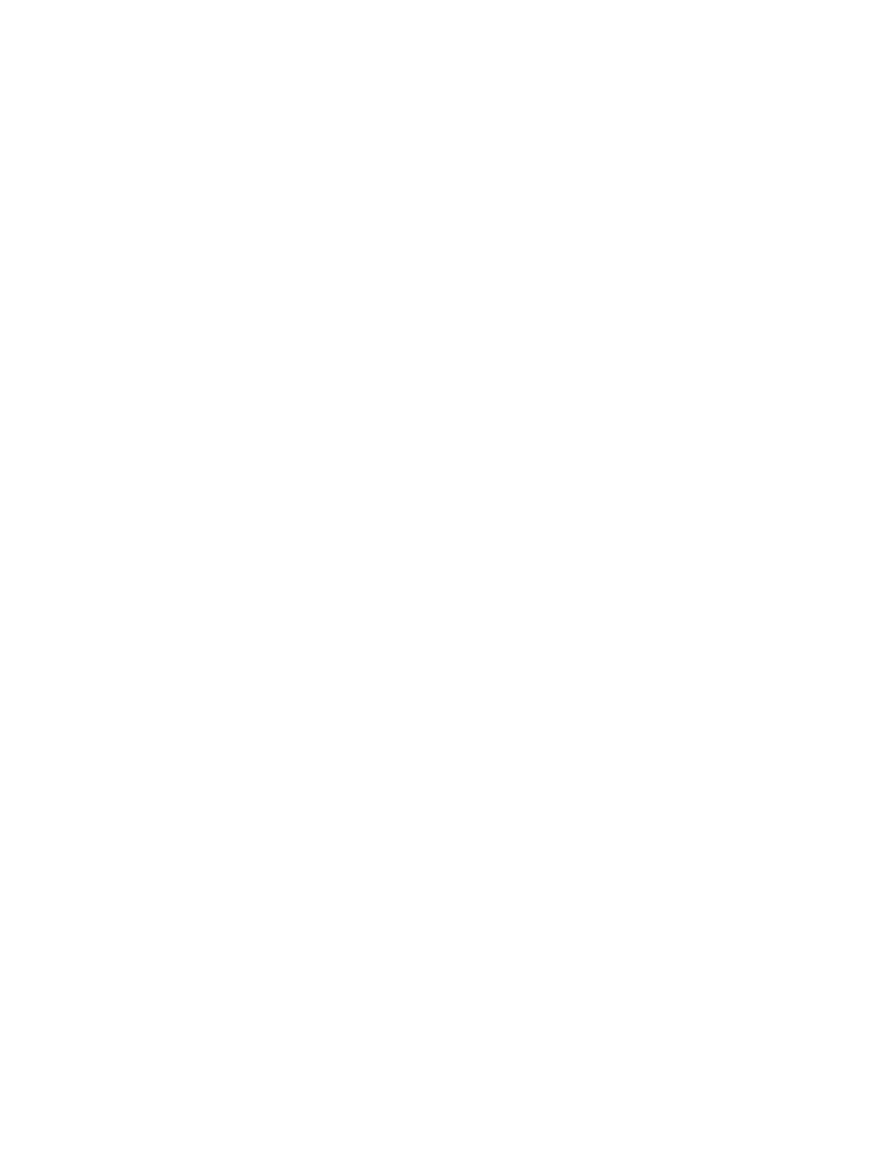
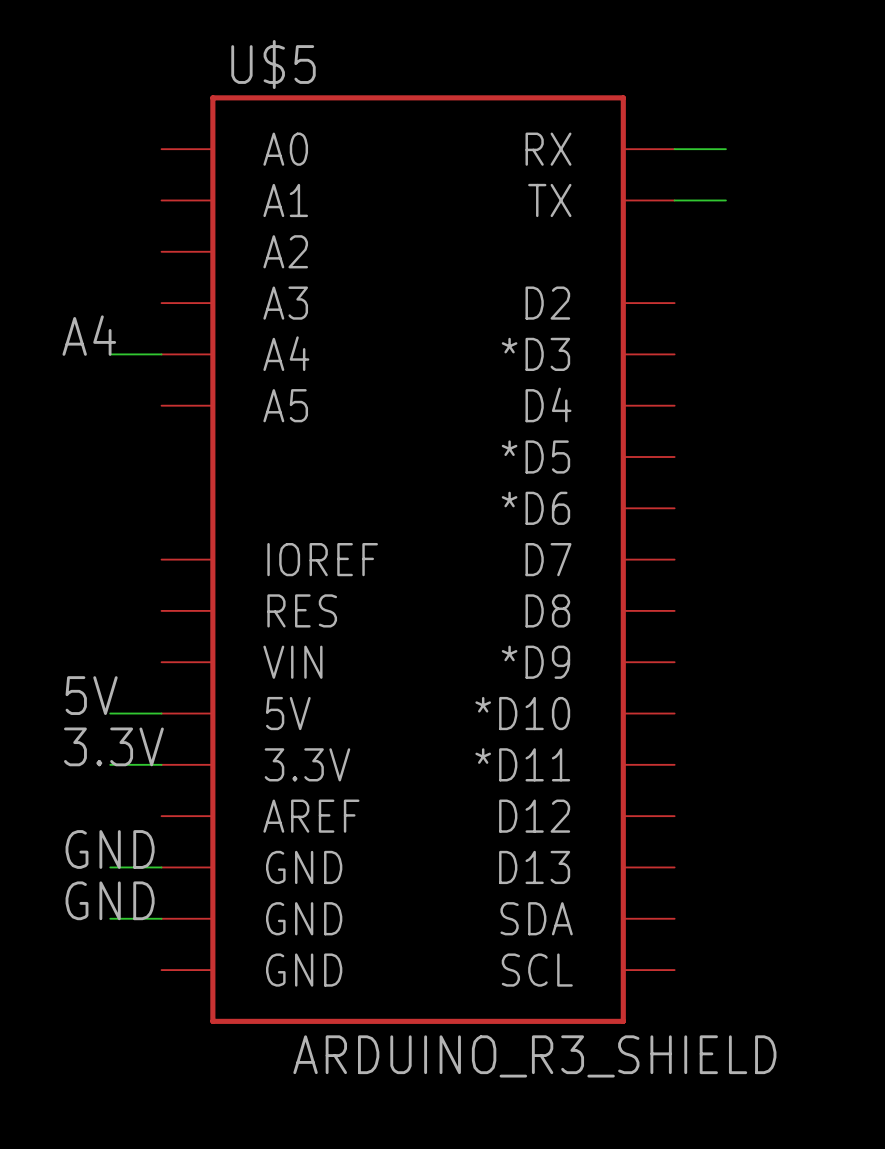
wire: none -> (674, 149) (725, 149)
wire: none -> (674, 200) (725, 200)
label: none -> A4 (89, 335)
wire: none -> (110, 354) (161, 354)
U$5: none -> ARDUINO_R3_SHIELD (418, 559)
label: none -> 5V (91, 695)
wire: none -> (110, 713) (161, 713)
label: none -> 3.3V (113, 746)
wire: none -> (110, 764) (161, 764)
label: none -> GND (110, 849)
wire: none -> (110, 867) (161, 867)
label: none -> GND (110, 900)
wire: none -> (110, 918) (161, 918)

